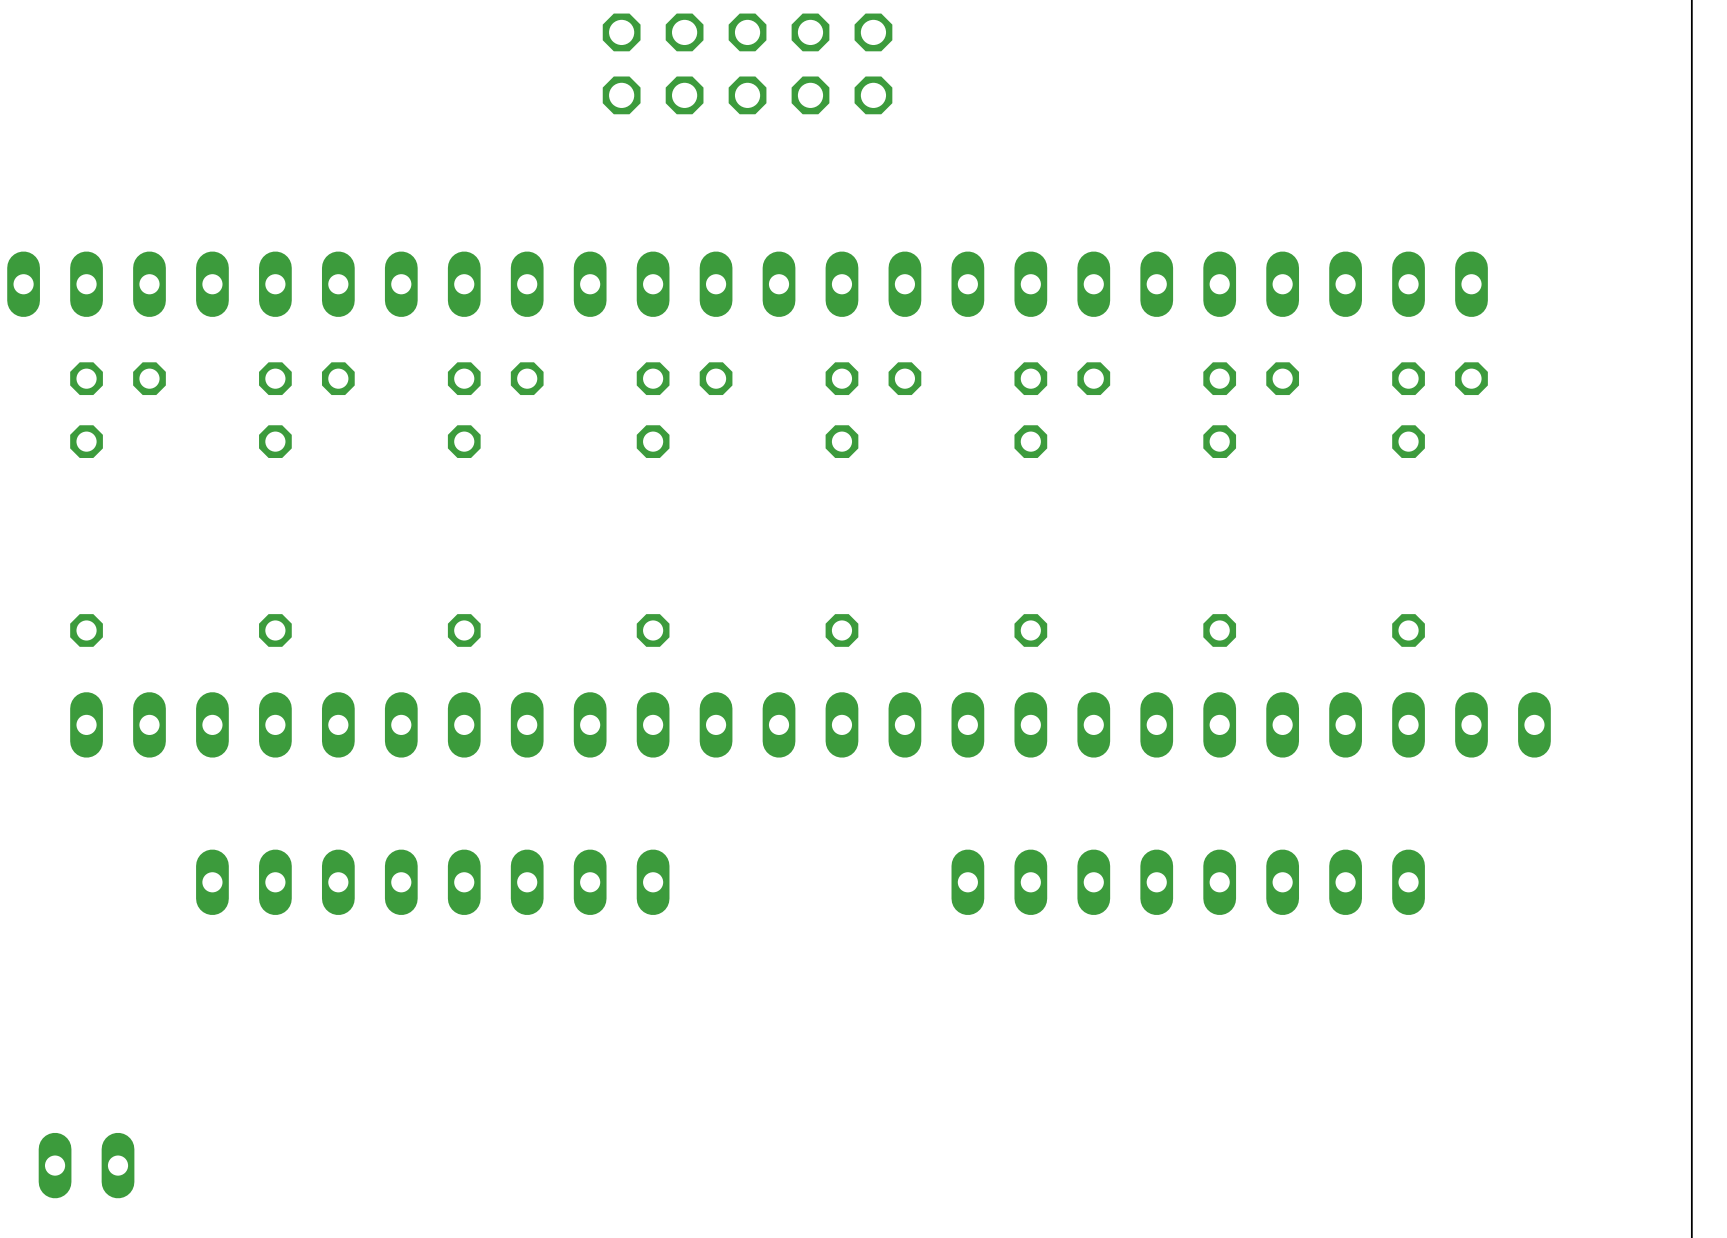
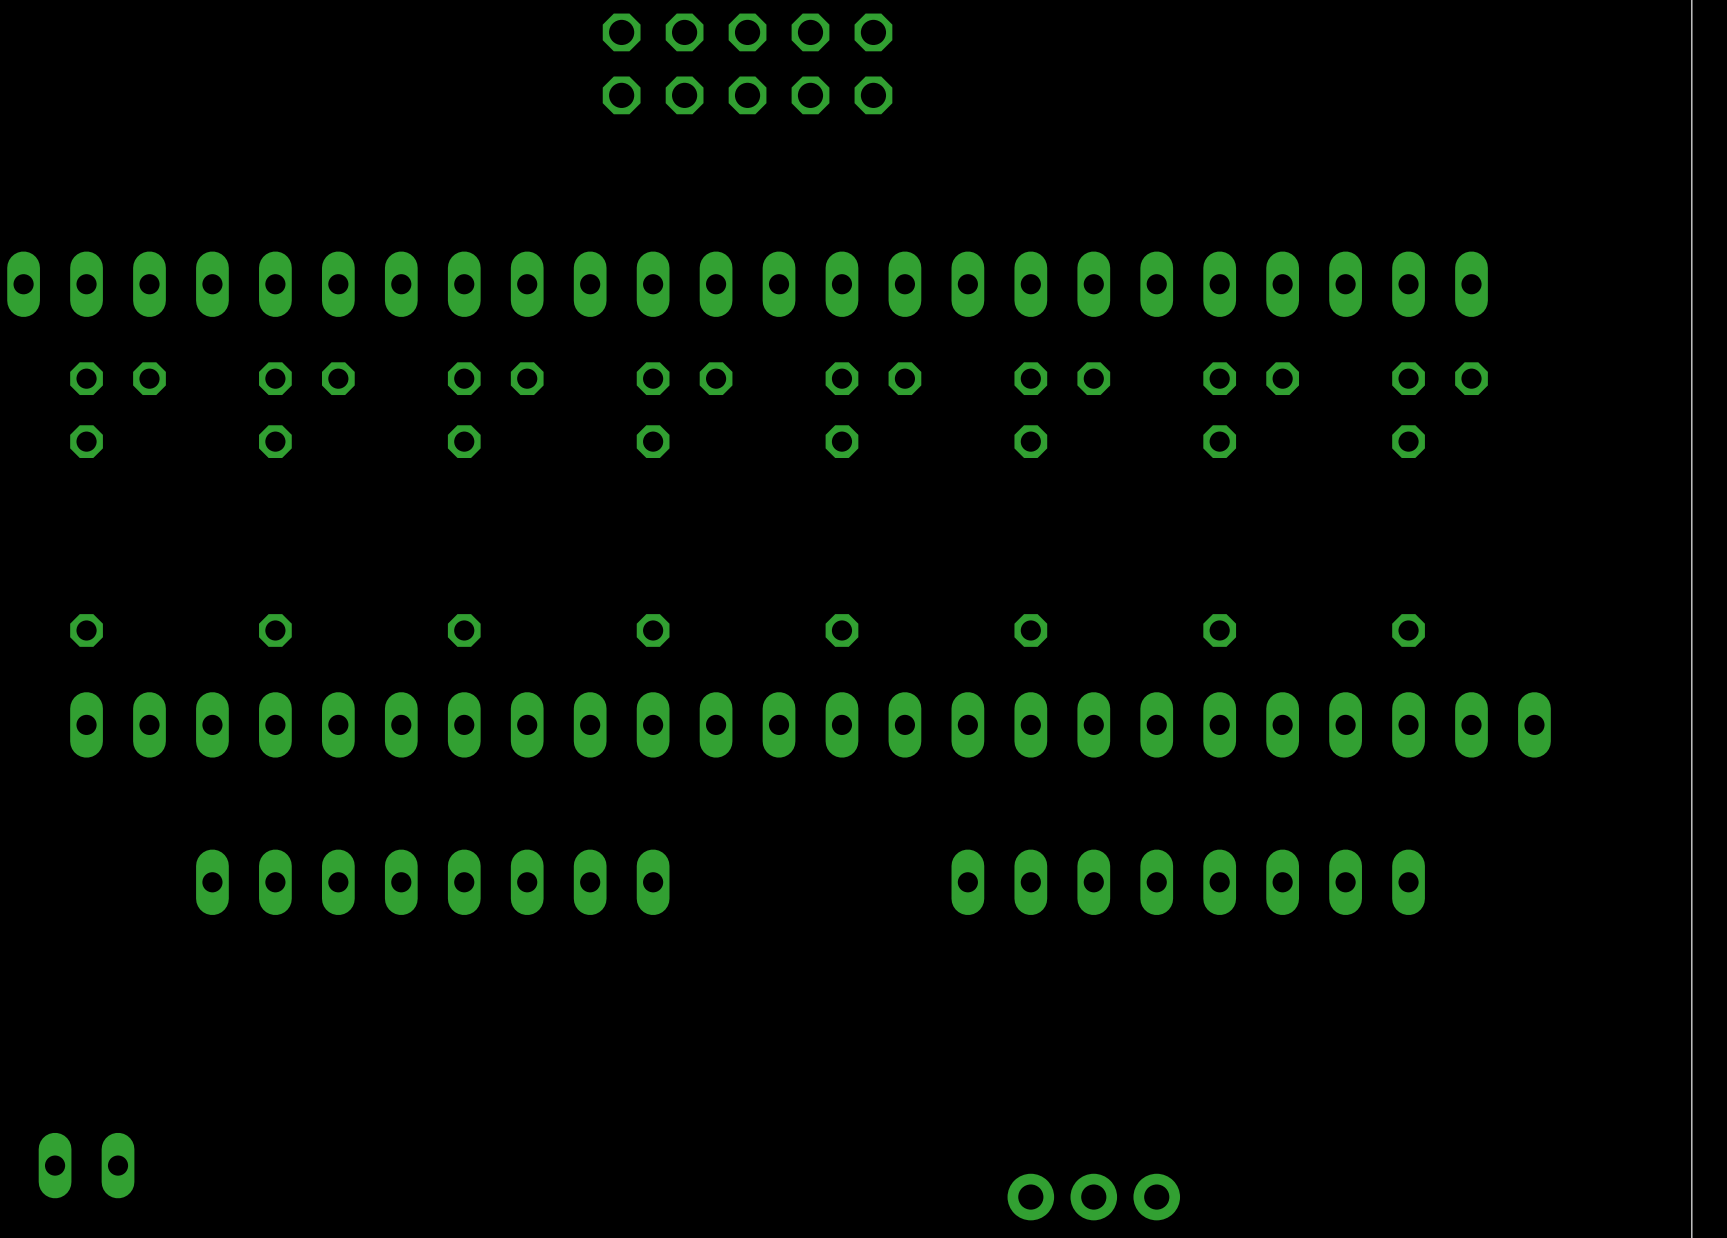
part: none -> (1093, 1197)

